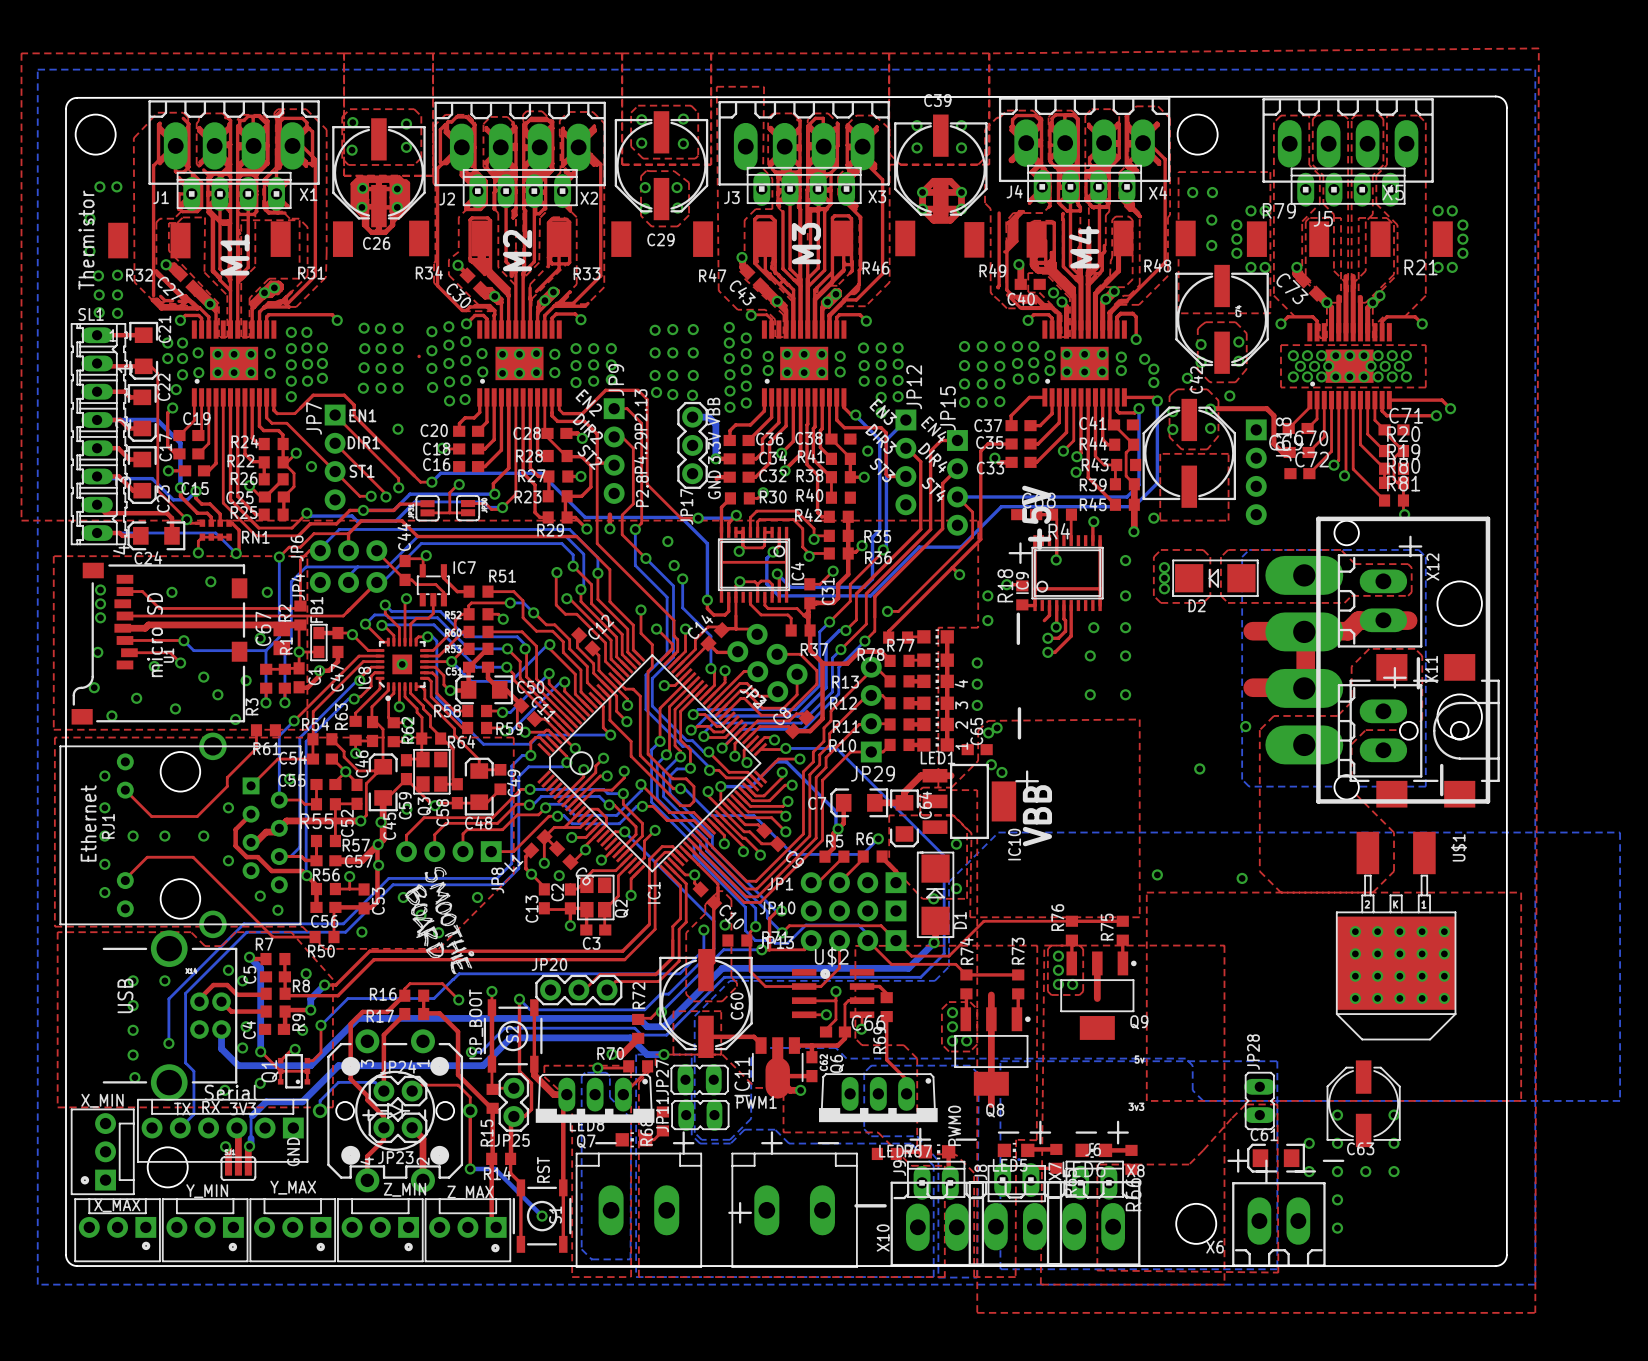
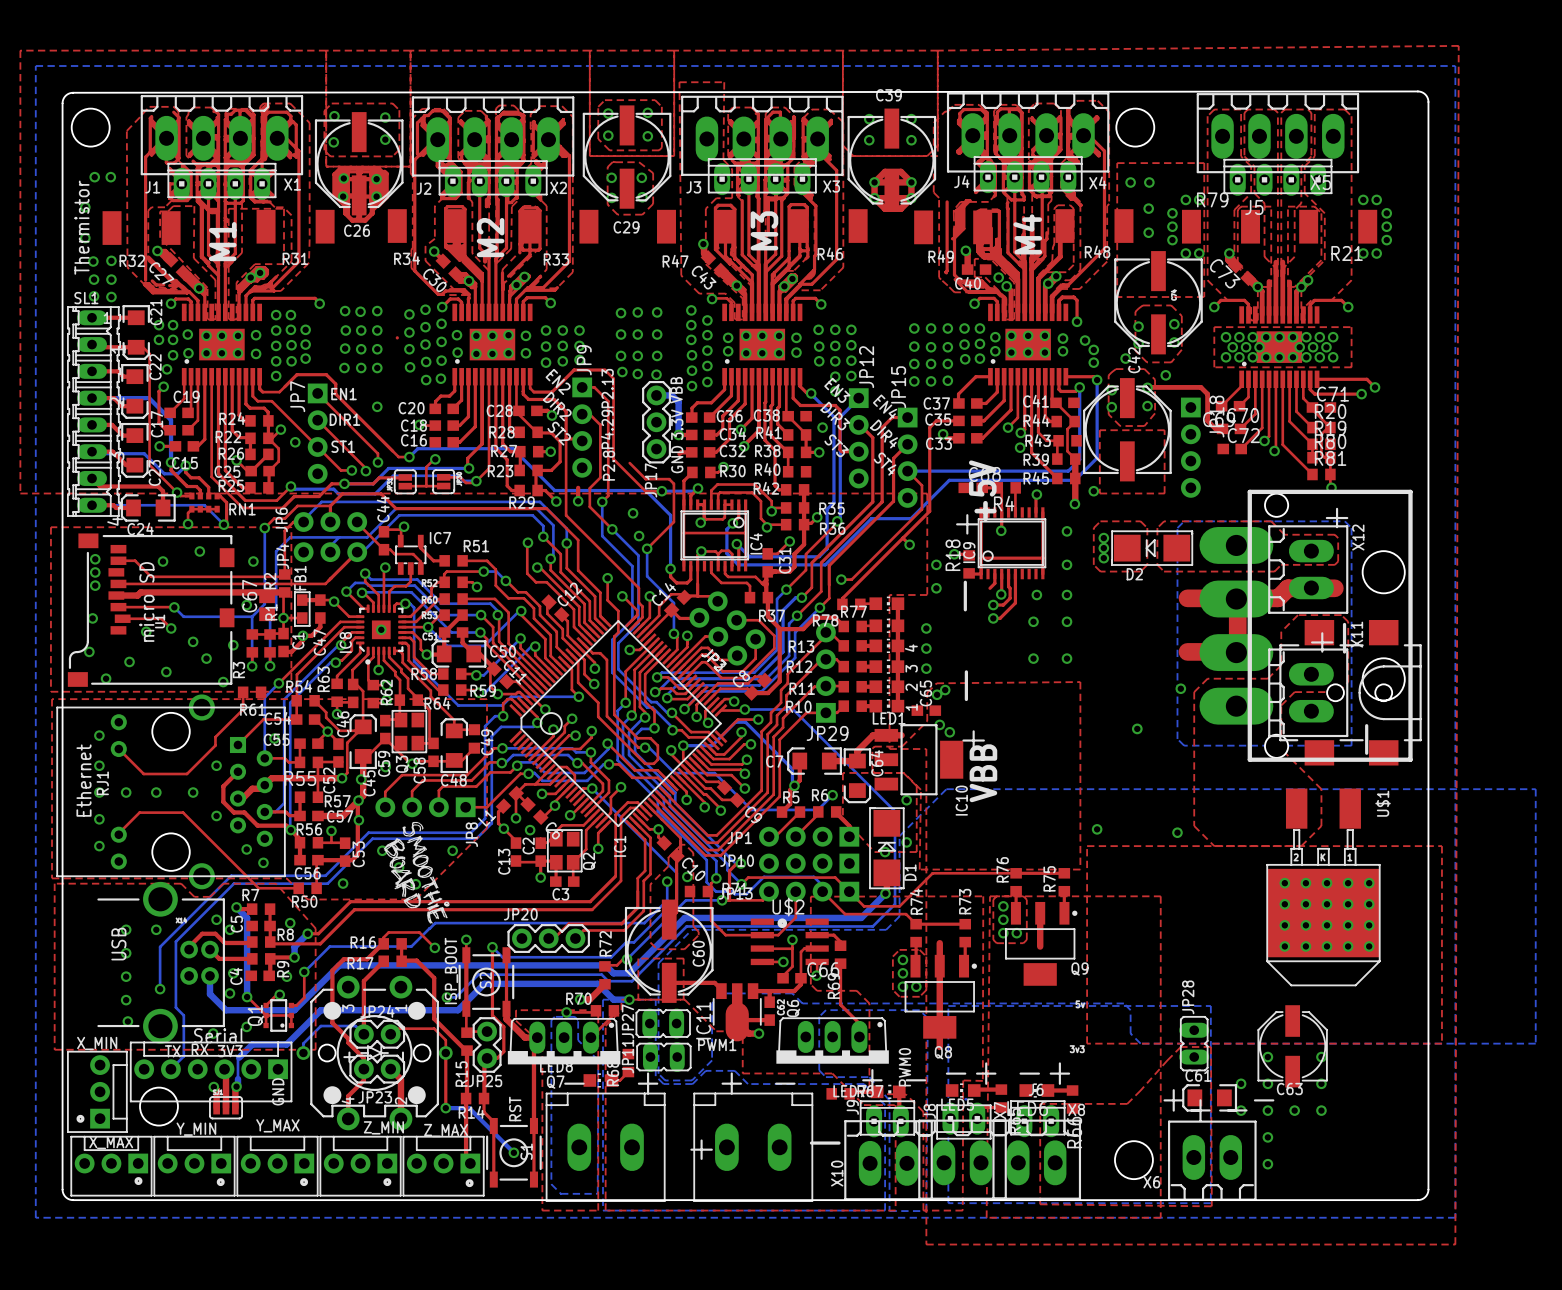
top track: none -> (629, 463) (645, 479) (669, 479) (673, 483) (673, 522) (647, 548)

